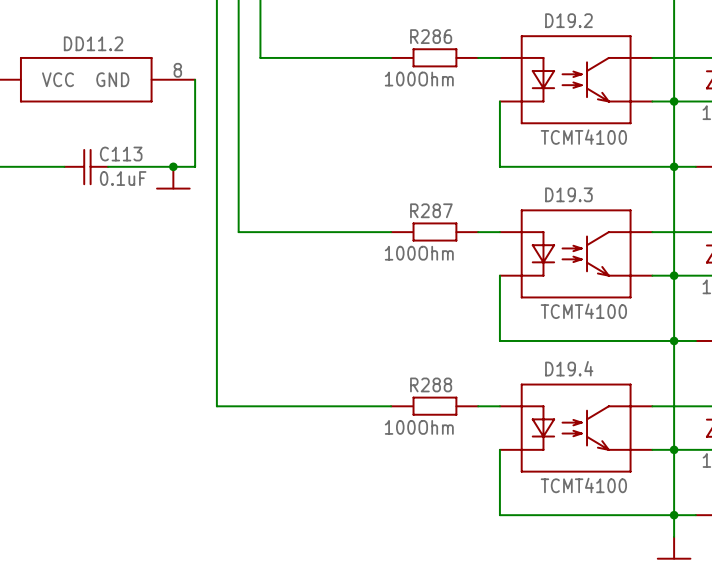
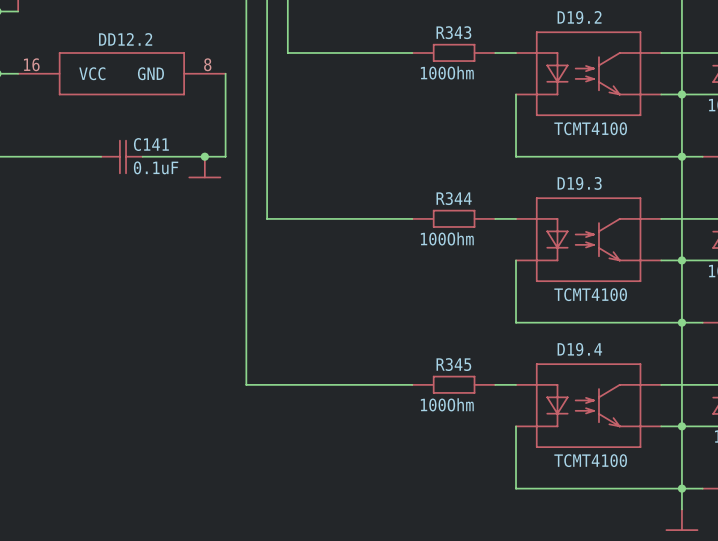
R286 name: R286 (431, 36) -> R343 (453, 32)
DD11.2 name: DD11.2 (93, 43) -> DD12.2 (125, 39)
C113 name: C113 (121, 154) -> C141 (151, 144)
R287 name: R287 (431, 210) -> R344 (454, 198)
R288 name: R288 (431, 384) -> R345 (453, 364)

